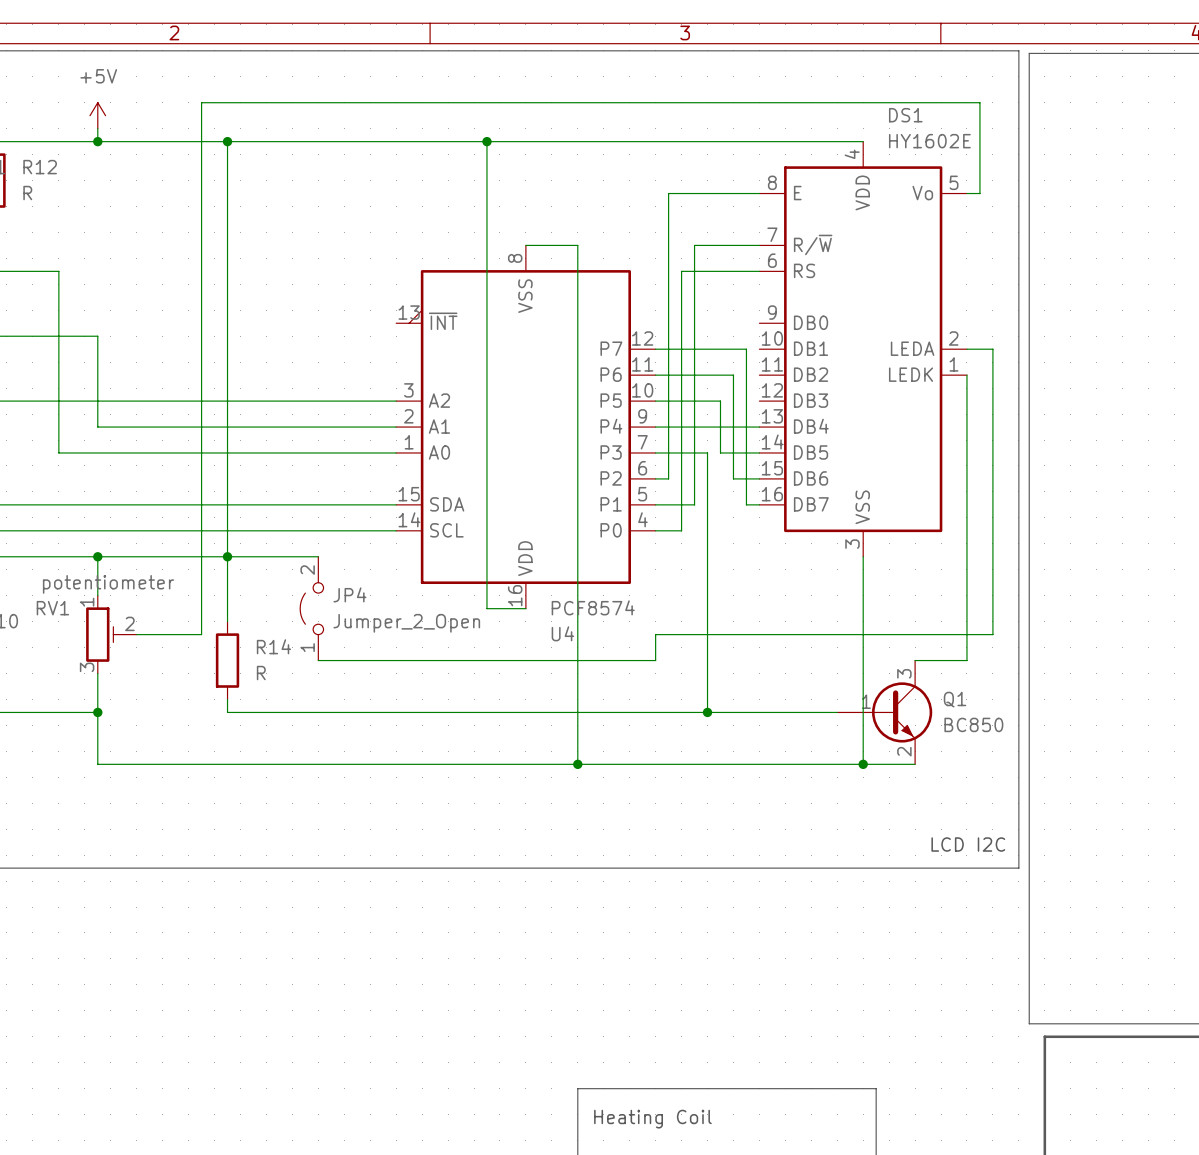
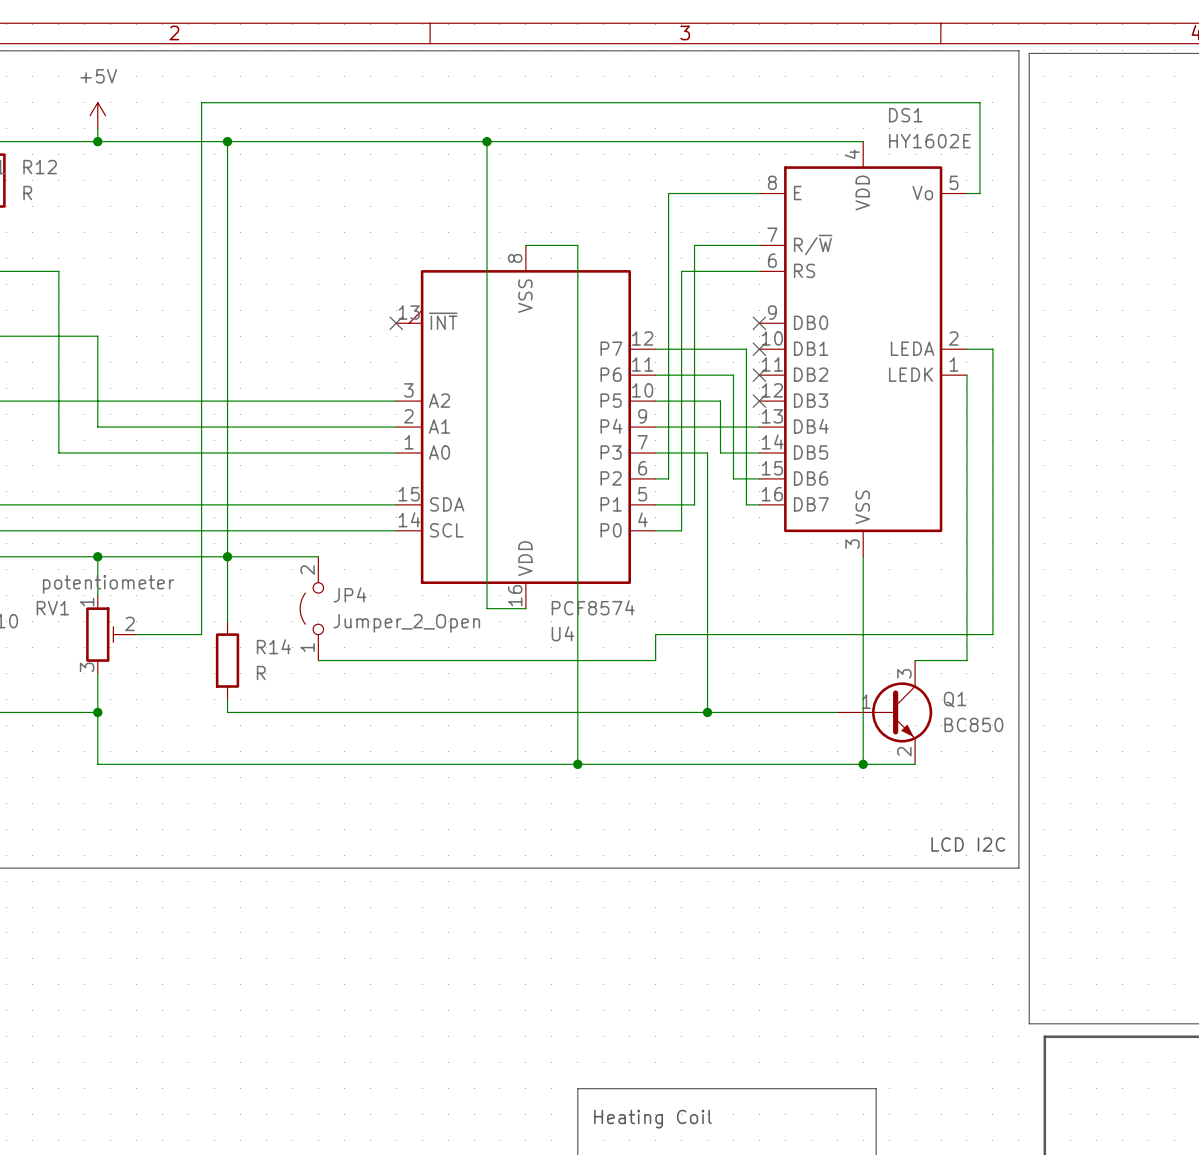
no-connect mark: none -> (396, 323)
no-connect mark: none -> (759, 323)
no-connect mark: none -> (759, 349)
no-connect mark: none -> (759, 375)
no-connect mark: none -> (759, 401)

